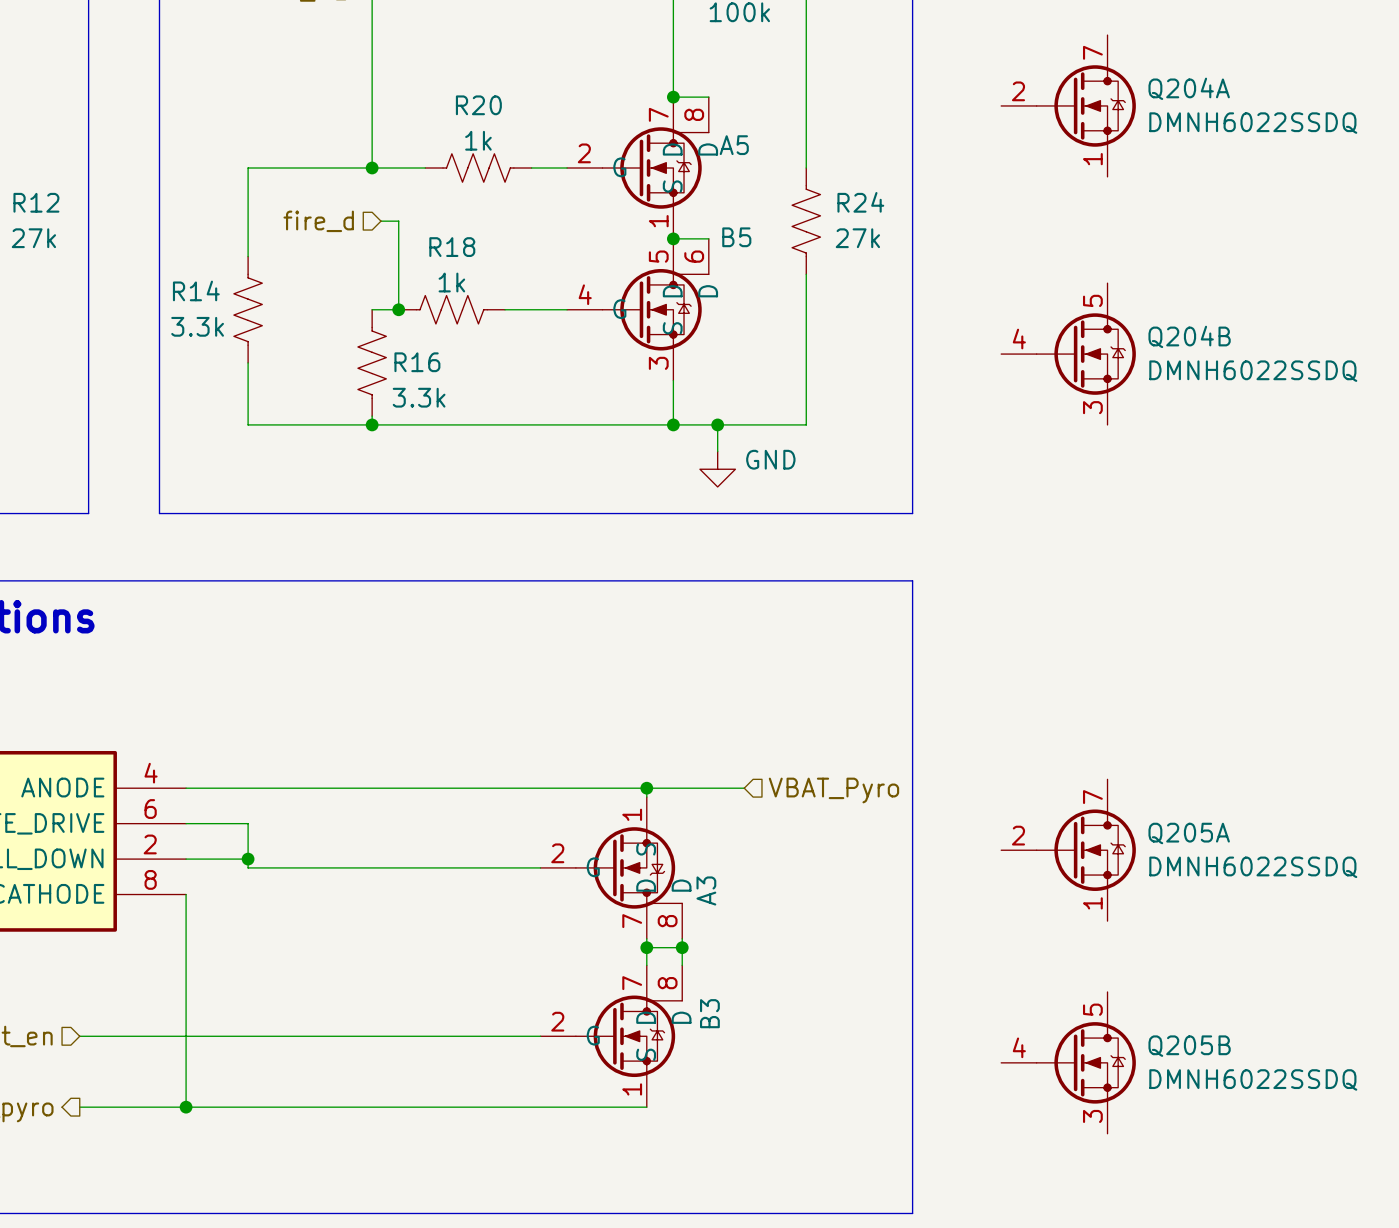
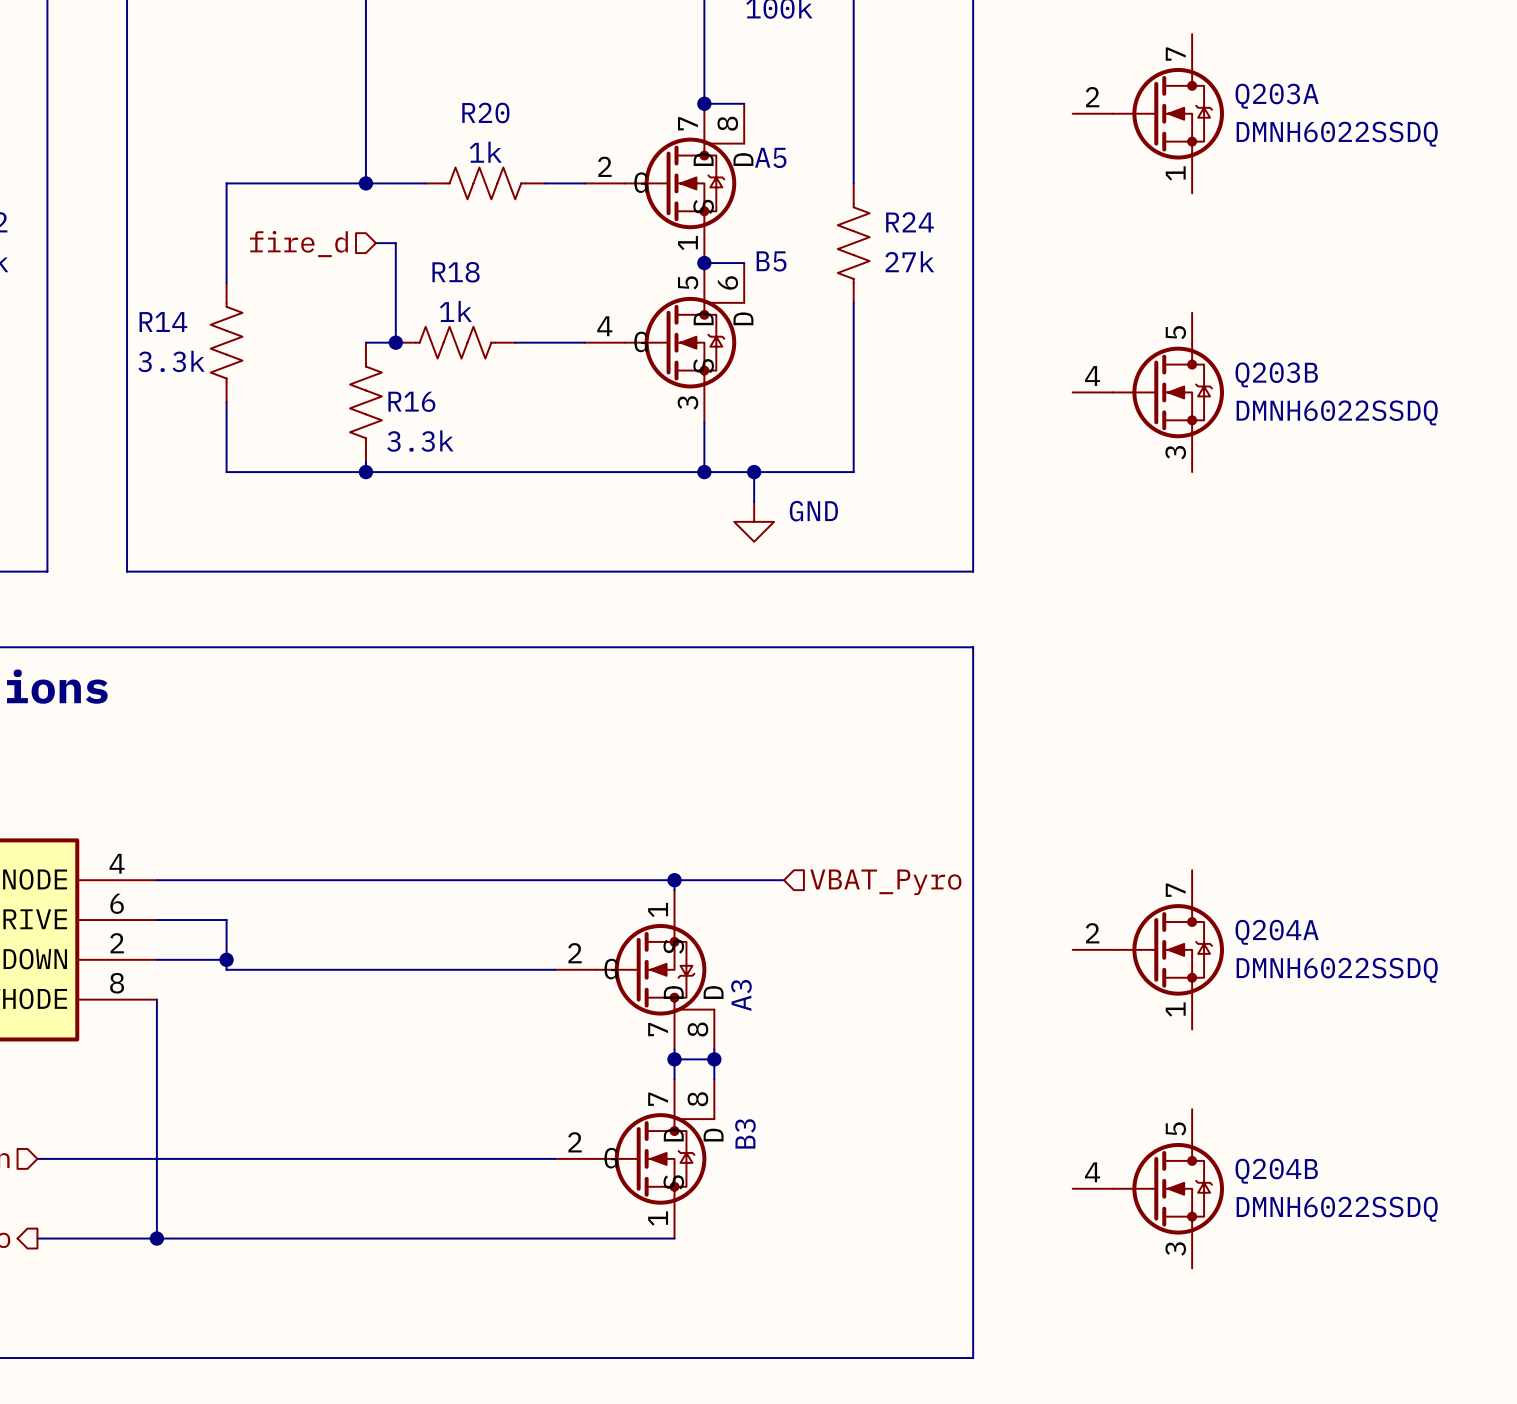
Q204A name: Q204A (1189, 88) -> Q203A (1277, 96)
Q204B name: Q204B (1189, 336) -> Q203B (1276, 374)
Q205A name: Q205A (1189, 833) -> Q204A (1277, 932)
Q205B name: Q205B (1189, 1046) -> Q204B (1276, 1171)

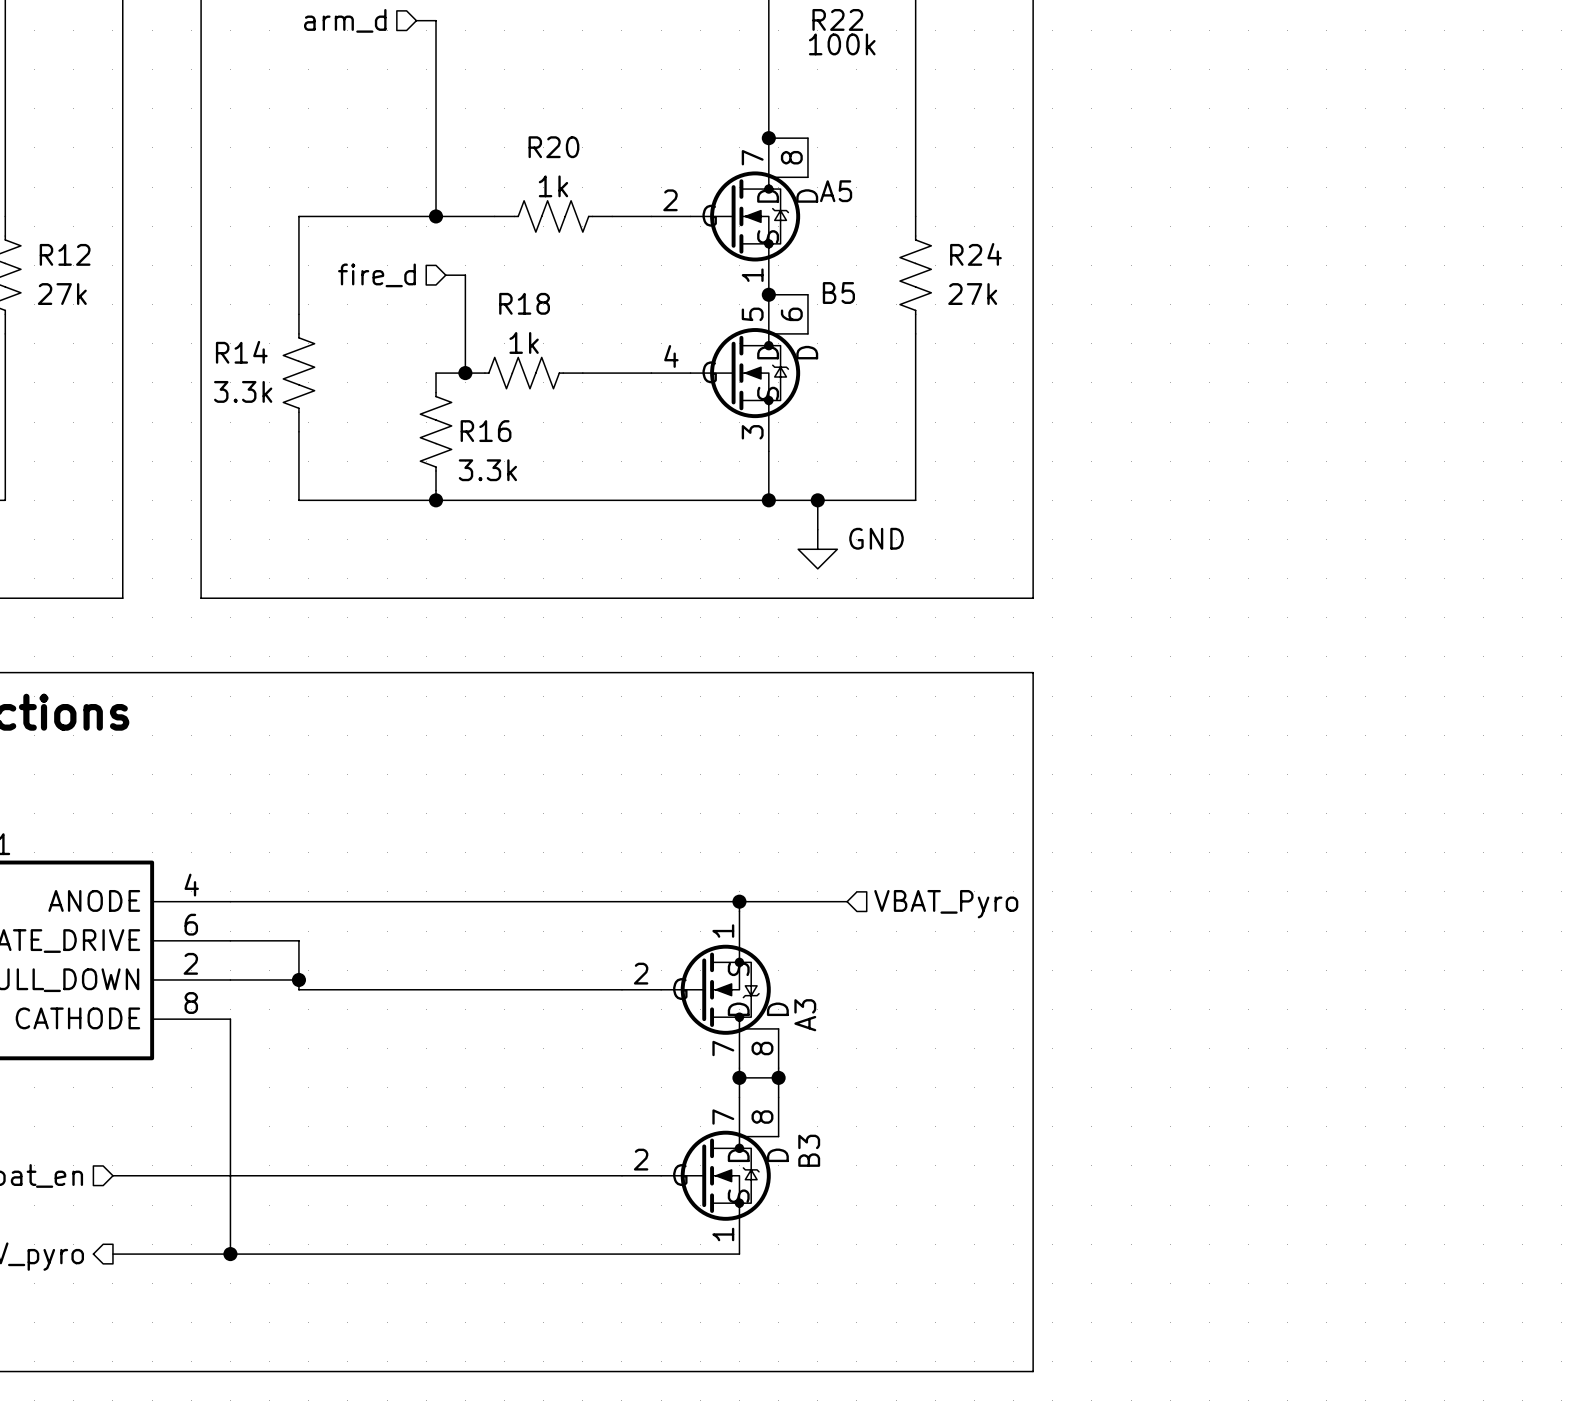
Q203A: DMNH6022SSDQ (1148, 113) -> none
Q203B: DMNH6022SSDQ (1148, 392) -> none
Q204A: DMNH6022SSDQ (1148, 949) -> none
Q204B: DMNH6022SSDQ (1148, 1188) -> none

